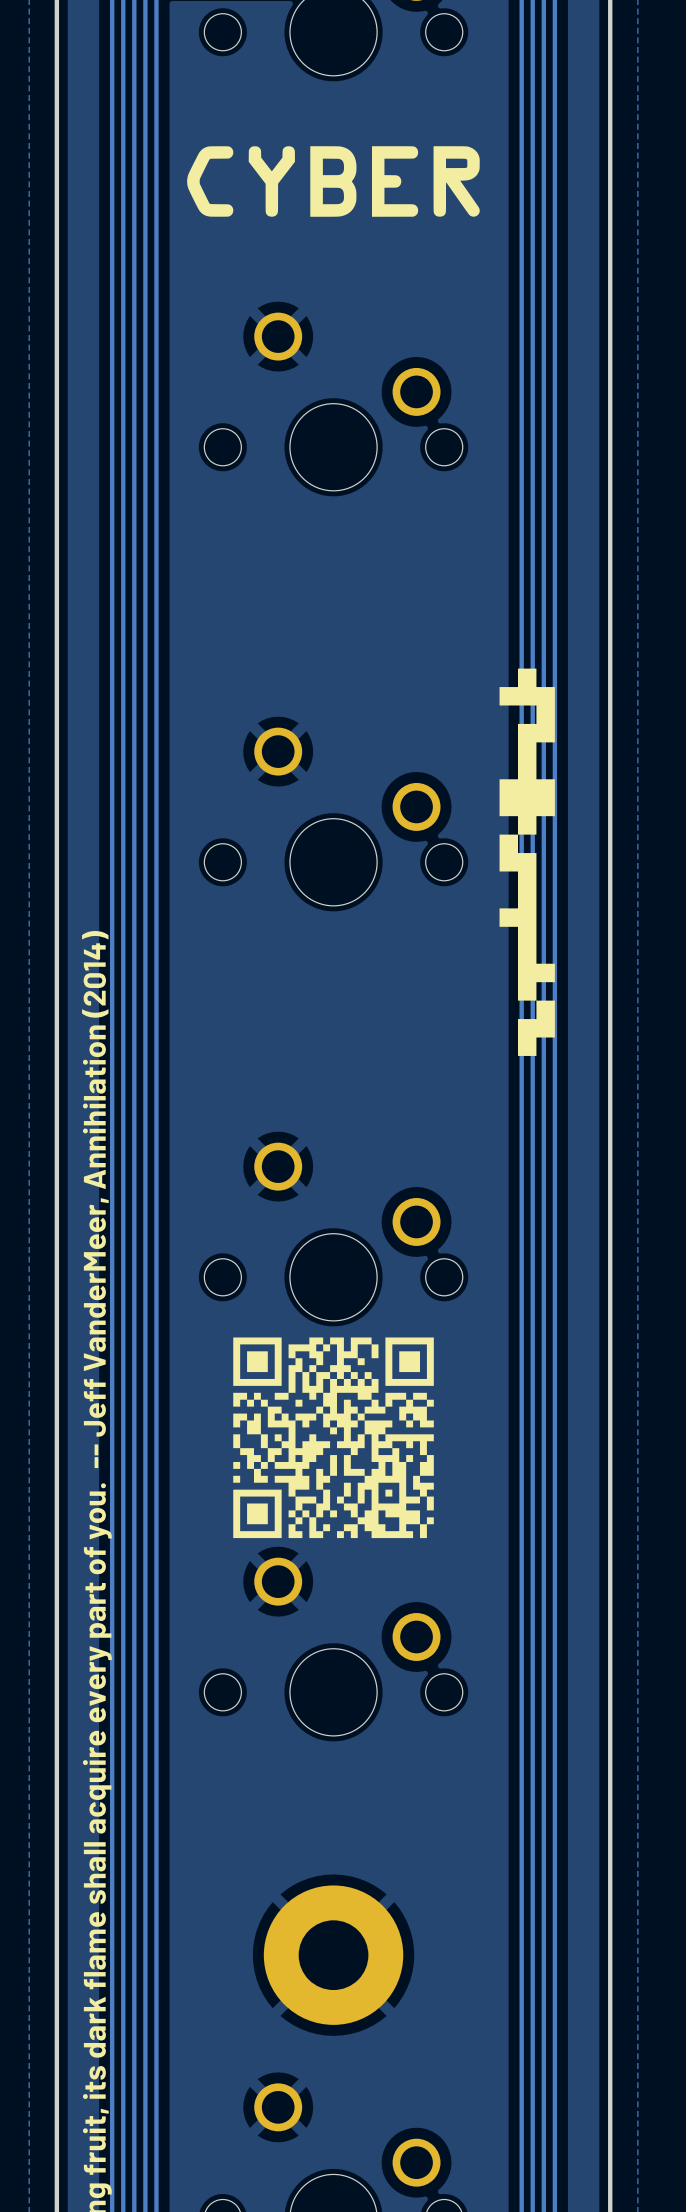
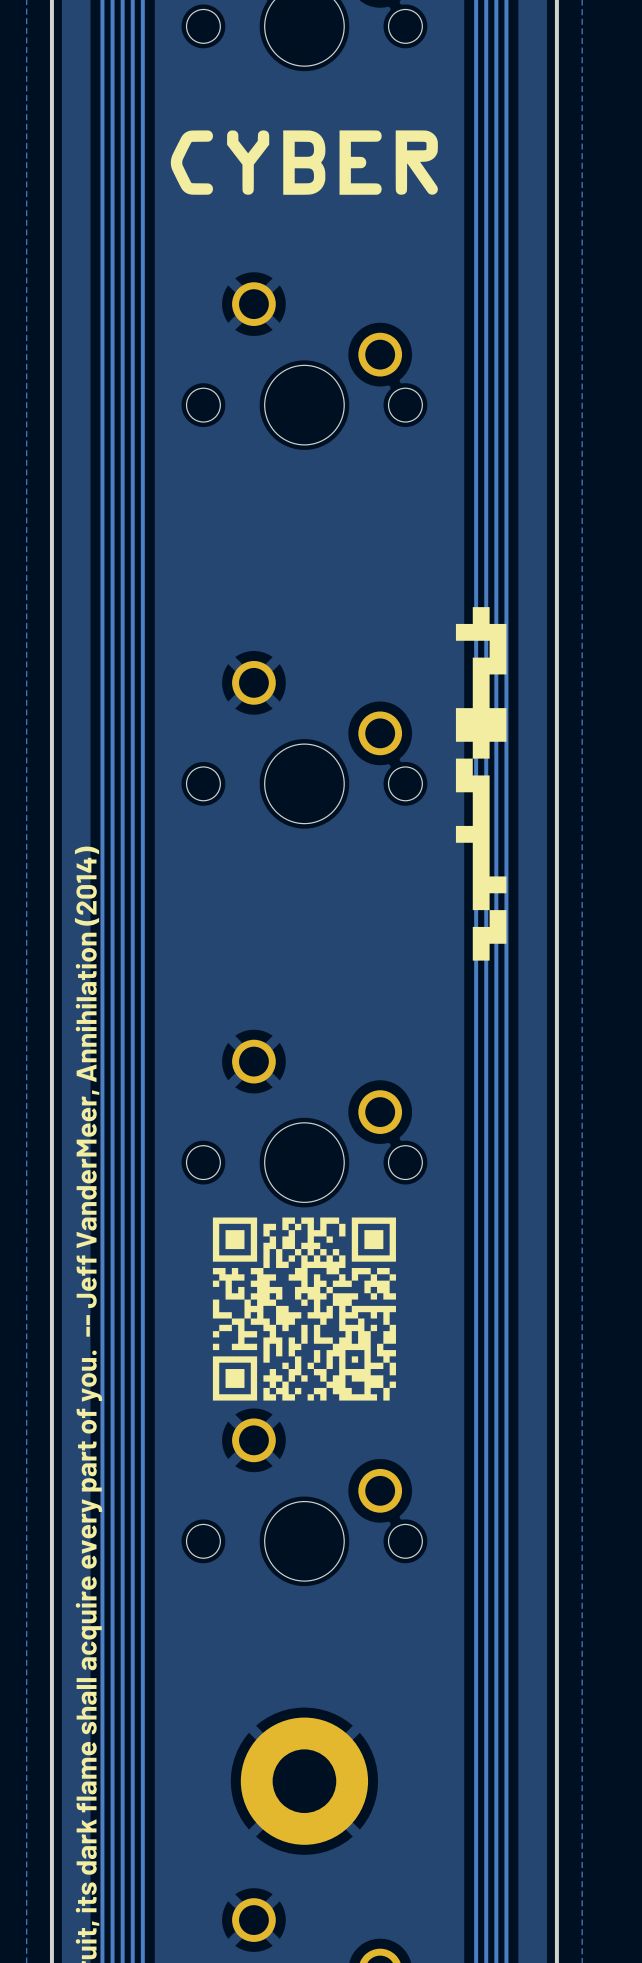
drawing shape: [233, 1337, 434, 1539] -> [212, 1217, 396, 1401]

